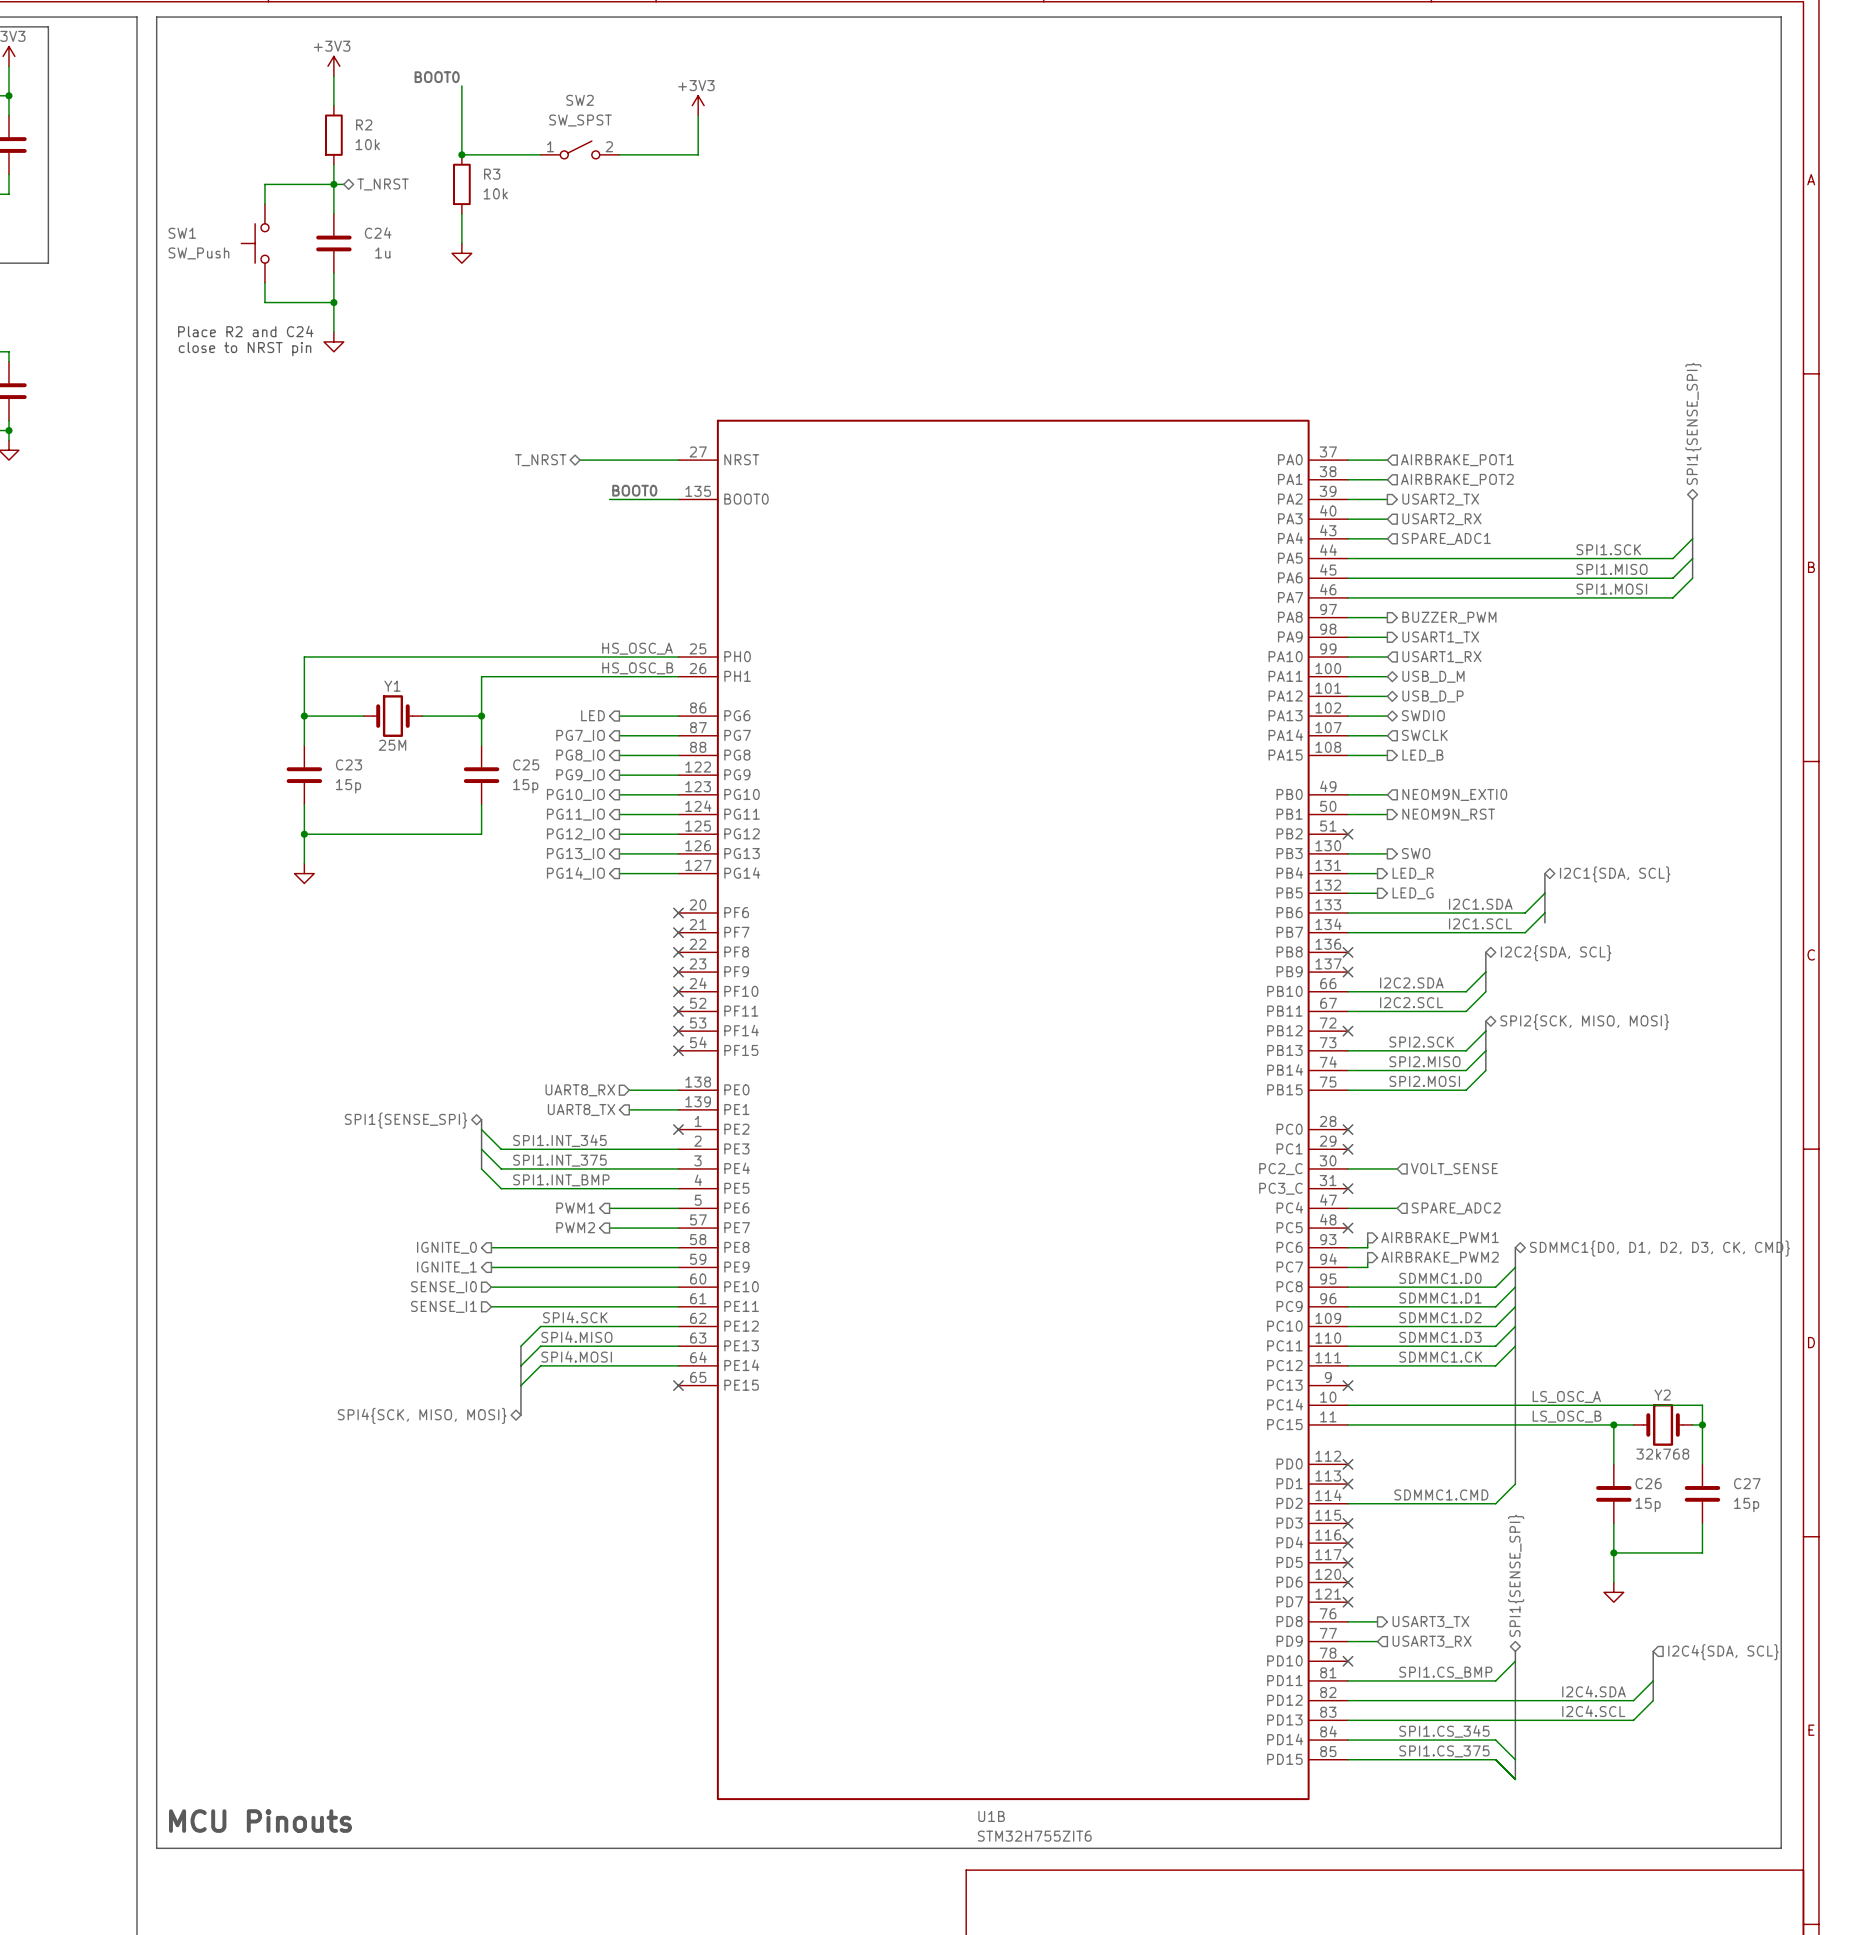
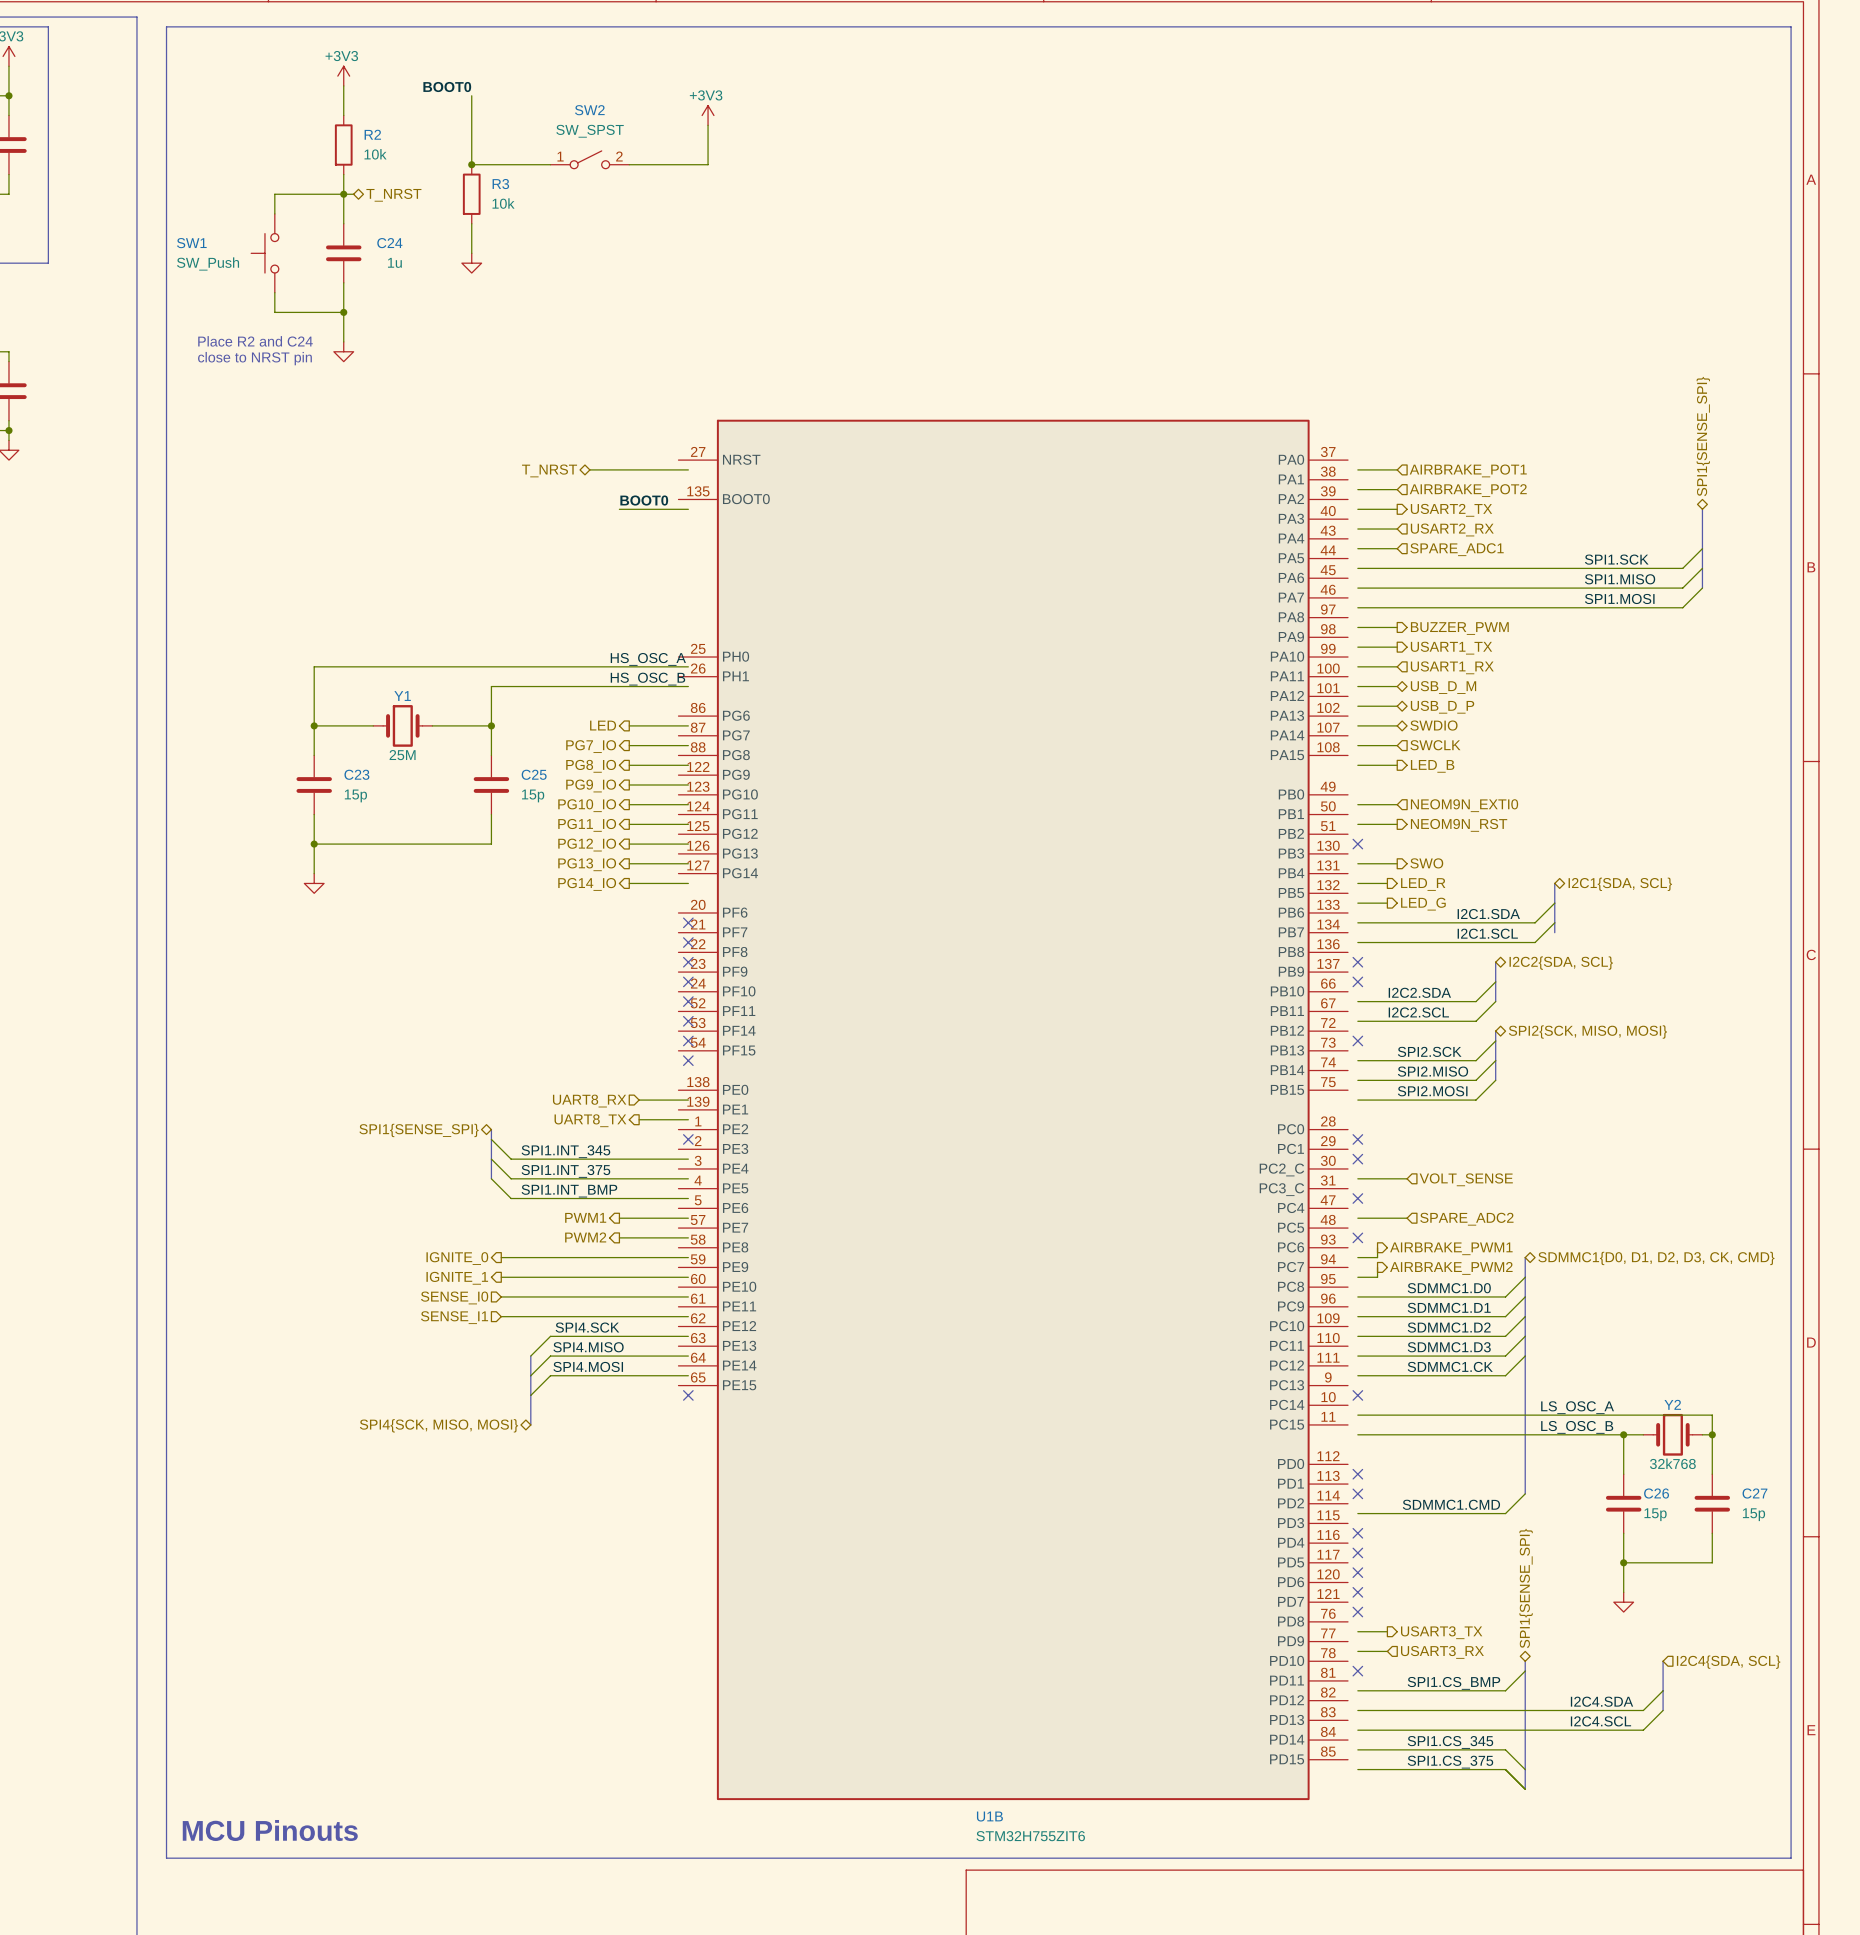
line: (156, 17) (1781, 17) (1781, 1848) (156, 1848) (156, 17) -> (166, 26) (1791, 26) (1791, 1858) (166, 1858) (166, 26)
power symbol position: +3V3 (333, 66) -> +3V3 (343, 76)
wire: (333, 76) (333, 105) -> (343, 85) (343, 115)
label position: BOOT0 (437, 77) -> BOOT0 (447, 87)
wire: (461, 85) (461, 154) (540, 154) -> (471, 95) (471, 164) (550, 164)
power symbol position: +3V3 (698, 105) -> +3V3 (708, 115)
wire: (698, 115) (698, 154) (619, 154) -> (708, 125) (708, 164) (629, 164)
R2 position: (333, 135) -> (343, 145)
SW2 position: (580, 149) -> (589, 159)
junction position: (461, 154) -> (471, 164)
wire: (333, 164) (333, 213) -> (343, 174) (343, 223)
junction position: (333, 184) -> (343, 194)
wire: (343, 184) (264, 184) (264, 204) -> (353, 194) (274, 194) (274, 213)
hierarchical label position: T_NRST (383, 184) -> T_NRST (393, 195)
R3 position: (461, 184) -> (471, 194)
wire: (461, 213) (461, 243) -> (471, 223) (471, 253)
SW1 position: (255, 243) -> (264, 253)
C24 position: (333, 243) -> (343, 253)
power symbol position: (461, 253) -> (471, 263)
wire: (333, 273) (333, 332) -> (343, 282) (343, 341)
wire: (264, 282) (264, 302) (333, 302) -> (274, 292) (274, 312) (343, 312)
junction position: (333, 302) -> (343, 312)
text position: Place R2 and C24 (245, 331) -> Place R2 and C24 (255, 341)
power symbol position: (333, 341) -> (343, 351)
text position: close to NRST pin (245, 349) -> close to NRST pin (254, 358)
hierarchical label position: SPI1{SENSE_SPI} (1693, 423) -> SPI1{SENSE_SPI} (1703, 436)
hierarchical label position: T_NRST (540, 460) -> T_NRST (549, 470)
wire: (580, 460) (678, 460) -> (589, 469) (688, 469)
wire: (1348, 460) (1387, 460) -> (1357, 469) (1397, 469)
hierarchical label position: AIRBRAKE_POT1 (1457, 460) -> AIRBRAKE_POT1 (1468, 470)
wire: (1348, 479) (1387, 479) -> (1357, 489) (1397, 489)
hierarchical label position: AIRBRAKE_POT2 (1457, 479) -> AIRBRAKE_POT2 (1468, 490)
label position: BOOT0 (634, 490) -> BOOT0 (644, 500)
wire: (609, 499) (678, 499) -> (619, 509) (688, 509)
wire: (1348, 499) (1387, 499) -> (1357, 509) (1397, 509)
hierarchical label position: USART2_TX (1440, 499) -> USART2_TX (1451, 510)
bus: (1692, 499) (1692, 578) -> (1702, 509) (1702, 588)
wire: (1348, 519) (1387, 519) -> (1357, 529) (1397, 529)
hierarchical label position: USART2_RX (1441, 519) -> USART2_RX (1452, 529)
wire: (1348, 538) (1387, 538) -> (1357, 548) (1397, 548)
hierarchical label position: SPARE_ADC1 (1446, 538) -> SPARE_ADC1 (1457, 549)
wire: (1692, 538) (1672, 558) (1348, 558) -> (1702, 588) (1682, 607) (1357, 607)
wire: none -> (1702, 548) (1692, 558)
label position: SPI1.SCK (1608, 549) -> SPI1.SCK (1616, 559)
wire: (1682, 568) (1672, 578) (1348, 578) -> (1682, 568) (1357, 568)
wire: none -> (1702, 568) (1692, 578)
label position: SPI1.MISO (1612, 569) -> SPI1.MISO (1620, 579)
wire: (1682, 588) (1672, 597) (1348, 597) -> (1682, 588) (1357, 588)
label position: SPI1.MOSI (1611, 589) -> SPI1.MOSI (1619, 598)
wire: (1348, 617) (1387, 617) -> (1357, 627) (1397, 627)
hierarchical label position: BUZZER_PWM (1449, 617) -> BUZZER_PWM (1459, 628)
wire: (1348, 637) (1387, 637) -> (1357, 647) (1397, 647)
hierarchical label position: USART1_TX (1440, 637) -> USART1_TX (1451, 648)
label position: HS_OSC_A (637, 648) -> HS_OSC_A (648, 659)
wire: (678, 657) (304, 657) (304, 745) -> (688, 666) (314, 666) (314, 755)
wire: (1348, 657) (1387, 657) -> (1357, 666) (1397, 666)
hierarchical label position: USART1_RX (1441, 657) -> USART1_RX (1452, 667)
label position: HS_OSC_B (637, 668) -> HS_OSC_B (647, 679)
wire: (678, 676) (481, 676) (481, 745) -> (688, 686) (491, 686) (491, 755)
wire: (1348, 676) (1387, 676) -> (1357, 686) (1397, 686)
hierarchical label position: USB_D_M (1433, 676) -> USB_D_M (1443, 687)
wire: (1348, 696) (1387, 696) -> (1357, 706) (1397, 706)
hierarchical label position: USB_D_P (1433, 696) -> USB_D_P (1442, 707)
hierarchical label position: LED (593, 715) -> LED (603, 725)
hierarchical label position: SWDIO (1423, 715) -> SWDIO (1433, 725)
wire: (304, 716) (363, 716) -> (314, 725) (373, 725)
junction position: (304, 716) -> (314, 725)
Y1 position: (392, 716) -> (402, 725)
wire: (422, 716) (481, 716) -> (432, 725) (491, 725)
junction position: (481, 716) -> (491, 725)
wire: (619, 716) (678, 716) -> (629, 725) (688, 725)
wire: (1348, 716) (1387, 716) -> (1357, 725) (1397, 725)
hierarchical label position: PG7_IO (580, 735) -> PG7_IO (591, 746)
wire: (619, 735) (678, 735) -> (629, 745) (688, 745)
wire: (1348, 735) (1387, 735) -> (1357, 745) (1397, 745)
hierarchical label position: SWCLK (1424, 735) -> SWCLK (1435, 745)
hierarchical label position: PG8_IO (580, 755) -> PG8_IO (591, 766)
wire: (619, 755) (678, 755) -> (629, 765) (688, 765)
wire: (1348, 755) (1387, 755) -> (1357, 765) (1397, 765)
hierarchical label position: LED_B (1422, 755) -> LED_B (1432, 766)
C23 position: (304, 775) -> (314, 784)
C25 position: (481, 775) -> (491, 784)
hierarchical label position: PG9_IO (580, 775) -> PG9_IO (591, 785)
wire: (619, 775) (678, 775) -> (629, 784) (688, 784)
hierarchical label position: PG10_IO (575, 794) -> PG10_IO (587, 805)
wire: (619, 794) (678, 794) -> (629, 804) (688, 804)
wire: (1348, 794) (1387, 794) -> (1357, 804) (1397, 804)
hierarchical label position: NEOM9N_EXTI0 (1454, 794) -> NEOM9N_EXTI0 (1464, 805)
wire: (304, 804) (304, 863) -> (314, 814) (314, 873)
wire: (481, 804) (481, 834) (304, 834) -> (491, 814) (491, 844) (314, 844)
hierarchical label position: PG11_IO (575, 814) -> PG11_IO (587, 825)
wire: (619, 814) (678, 814) -> (629, 824) (688, 824)
wire: (1348, 814) (1387, 814) -> (1357, 824) (1397, 824)
hierarchical label position: NEOM9N_RST (1448, 814) -> NEOM9N_RST (1459, 825)
junction position: (304, 834) -> (314, 844)
hierarchical label position: PG12_IO (575, 834) -> PG12_IO (587, 845)
wire: (619, 834) (678, 834) -> (629, 844) (688, 844)
no-connect mark position: (1348, 834) -> (1357, 844)
wire: (619, 853) (678, 853) -> (629, 863) (688, 863)
wire: (1348, 853) (1387, 853) -> (1357, 863) (1397, 863)
hierarchical label position: SWO (1416, 853) -> SWO (1426, 863)
hierarchical label position: PG13_IO (575, 854) -> PG13_IO (587, 864)
power symbol position: (304, 873) -> (314, 883)
hierarchical label position: PG14_IO (575, 873) -> PG14_IO (587, 884)
wire: (619, 873) (678, 873) -> (629, 883) (688, 883)
wire: (1348, 873) (1377, 873) -> (1357, 883) (1387, 883)
hierarchical label position: LED_R (1413, 873) -> LED_R (1423, 884)
bus: (1544, 873) (1544, 922) -> (1554, 883) (1554, 932)
hierarchical label position: I2C1{SDA, SCL} (1615, 874) -> I2C1{SDA, SCL} (1620, 884)
wire: (1348, 893) (1377, 893) -> (1357, 903) (1387, 903)
hierarchical label position: LED_G (1413, 893) -> LED_G (1423, 904)
wire: (1544, 893) (1525, 912) (1348, 912) -> (1554, 922) (1535, 942) (1357, 942)
wire: none -> (1554, 903) (1544, 912)
label position: I2C1.SDA (1480, 904) -> I2C1.SDA (1488, 914)
no-connect mark: (678, 912) -> none
no-connect mark: none -> (688, 922)
wire: (1535, 922) (1525, 932) (1348, 932) -> (1535, 922) (1357, 922)
label position: I2C1.SCL (1480, 923) -> I2C1.SCL (1487, 933)
no-connect mark: (678, 932) -> none
no-connect mark: none -> (688, 942)
no-connect mark: (678, 952) -> none
no-connect mark: (1348, 952) -> none
bus: (1485, 952) (1485, 991) -> (1495, 962) (1495, 1001)
hierarchical label position: I2C2{SDA, SCL} (1556, 953) -> I2C2{SDA, SCL} (1561, 963)
no-connect mark: none -> (688, 962)
no-connect mark: none -> (1357, 962)
no-connect mark: (678, 972) -> none
no-connect mark: (1348, 972) -> none
wire: (1485, 972) (1466, 991) (1348, 991) -> (1495, 1001) (1476, 1021) (1357, 1021)
no-connect mark: none -> (688, 981)
no-connect mark: none -> (1357, 981)
wire: none -> (1495, 981) (1485, 991)
label position: I2C2.SDA (1411, 982) -> I2C2.SDA (1419, 992)
no-connect mark: (678, 991) -> none
no-connect mark: none -> (688, 1001)
wire: (1476, 1001) (1466, 1011) (1348, 1011) -> (1476, 1001) (1357, 1001)
label position: I2C2.SCL (1411, 1002) -> I2C2.SCL (1418, 1012)
no-connect mark: (678, 1011) -> none
no-connect mark: none -> (688, 1021)
bus: (1485, 1021) (1485, 1070) -> (1495, 1031) (1495, 1080)
hierarchical label position: SPI2{SCK, MISO, MOSI} (1584, 1022) -> SPI2{SCK, MISO, MOSI} (1587, 1031)
no-connect mark: (678, 1031) -> none
no-connect mark position: (1348, 1031) -> (1357, 1040)
wire: (1485, 1031) (1466, 1050) (1348, 1050) -> (1495, 1080) (1476, 1100) (1357, 1100)
no-connect mark: none -> (688, 1040)
wire: none -> (1495, 1040) (1485, 1050)
label position: SPI2.SCK (1421, 1042) -> SPI2.SCK (1429, 1051)
no-connect mark: (678, 1050) -> none
no-connect mark: none -> (688, 1060)
wire: (1476, 1060) (1466, 1070) (1348, 1070) -> (1476, 1060) (1357, 1060)
wire: none -> (1495, 1060) (1485, 1070)
label position: SPI2.MISO (1424, 1061) -> SPI2.MISO (1433, 1071)
wire: (1476, 1080) (1466, 1090) (1348, 1090) -> (1476, 1080) (1357, 1080)
label position: SPI2.MOSI (1424, 1081) -> SPI2.MOSI (1432, 1091)
hierarchical label position: UART8_RX (580, 1090) -> UART8_RX (589, 1101)
wire: (629, 1090) (678, 1090) -> (639, 1100) (688, 1100)
wire: (629, 1109) (678, 1109) -> (639, 1119) (688, 1119)
hierarchical label position: UART8_TX (581, 1110) -> UART8_TX (590, 1120)
bus: (481, 1119) (481, 1168) -> (491, 1129) (491, 1178)
hierarchical label position: SPI1{SENSE_SPI} (405, 1120) -> SPI1{SENSE_SPI} (419, 1130)
no-connect mark position: (678, 1129) -> (688, 1139)
no-connect mark: (1348, 1129) -> none
no-connect mark: none -> (1357, 1139)
label position: SPI1.INT_345 (559, 1140) -> SPI1.INT_345 (565, 1151)
wire: (481, 1149) (491, 1159) -> none
wire: (501, 1149) (678, 1149) -> (501, 1149) (511, 1159) (688, 1159)
no-connect mark: (1348, 1149) -> none
no-connect mark: none -> (1357, 1159)
label position: SPI1.INT_375 (559, 1160) -> SPI1.INT_375 (565, 1171)
wire: (481, 1168) (491, 1178) -> none
wire: (501, 1168) (678, 1168) -> (501, 1168) (511, 1178) (688, 1178)
wire: (1348, 1168) (1397, 1168) -> (1357, 1178) (1407, 1178)
hierarchical label position: VOLT_SENSE (1454, 1169) -> VOLT_SENSE (1466, 1179)
label position: SPI1.INT_BMP (561, 1180) -> SPI1.INT_BMP (569, 1191)
wire: (501, 1188) (678, 1188) -> (501, 1188) (511, 1198) (688, 1198)
no-connect mark position: (1348, 1188) -> (1357, 1198)
hierarchical label position: PWM1 (575, 1207) -> PWM1 (585, 1217)
wire: (609, 1208) (678, 1208) -> (619, 1218) (688, 1218)
wire: (1348, 1208) (1397, 1208) -> (1357, 1218) (1407, 1218)
hierarchical label position: SPARE_ADC2 (1456, 1208) -> SPARE_ADC2 (1466, 1219)
hierarchical label position: PWM2 (575, 1227) -> PWM2 (585, 1237)
wire: (609, 1228) (678, 1228) -> (619, 1237) (688, 1237)
no-connect mark position: (1348, 1228) -> (1357, 1237)
wire: (1367, 1237) (1367, 1247) (1348, 1247) -> (1377, 1247) (1377, 1257) (1357, 1257)
hierarchical label position: AIRBRAKE_PWM1 (1440, 1238) -> AIRBRAKE_PWM1 (1451, 1248)
hierarchical label position: IGNITE_0 (446, 1247) -> IGNITE_0 (457, 1258)
wire: (491, 1247) (678, 1247) -> (501, 1257) (688, 1257)
bus: (1515, 1247) (1515, 1484) -> (1525, 1257) (1525, 1493)
hierarchical label position: SDMMC1{D0, D1, D2, D3, CK, CMD} (1659, 1248) -> SDMMC1{D0, D1, D2, D3, CK, CMD} (1656, 1258)
wire: (1367, 1257) (1367, 1267) (1348, 1267) -> (1377, 1267) (1377, 1277) (1357, 1277)
hierarchical label position: AIRBRAKE_PWM2 (1440, 1257) -> AIRBRAKE_PWM2 (1451, 1268)
hierarchical label position: IGNITE_1 (446, 1267) -> IGNITE_1 (457, 1278)
wire: (491, 1267) (678, 1267) -> (501, 1277) (688, 1277)
wire: (1515, 1267) (1495, 1287) (1348, 1287) -> (1525, 1356) (1505, 1375) (1357, 1375)
wire: none -> (1525, 1277) (1515, 1287)
label position: SDMMC1.D0 (1440, 1278) -> SDMMC1.D0 (1449, 1288)
hierarchical label position: SENSE_I0 (443, 1287) -> SENSE_I0 (454, 1297)
wire: (491, 1287) (678, 1287) -> (501, 1296) (688, 1296)
wire: (1505, 1296) (1495, 1306) (1348, 1306) -> (1505, 1296) (1357, 1296)
wire: none -> (1525, 1296) (1515, 1306)
label position: SDMMC1.D1 (1440, 1298) -> SDMMC1.D1 (1449, 1307)
hierarchical label position: SENSE_I1 (443, 1306) -> SENSE_I1 (454, 1317)
wire: (491, 1306) (678, 1306) -> (501, 1316) (688, 1316)
wire: (1505, 1316) (1495, 1326) (1348, 1326) -> (1505, 1316) (1357, 1316)
wire: none -> (1525, 1316) (1515, 1326)
label position: SPI4.SCK (575, 1317) -> SPI4.SCK (587, 1327)
label position: SDMMC1.D2 (1440, 1317) -> SDMMC1.D2 (1449, 1327)
wire: (678, 1326) (540, 1326) (520, 1346) -> (688, 1375) (550, 1375) (530, 1395)
wire: (1505, 1336) (1495, 1346) (1348, 1346) -> (1505, 1336) (1357, 1336)
wire: none -> (1525, 1336) (1515, 1346)
label position: SPI4.MISO (576, 1337) -> SPI4.MISO (588, 1347)
label position: SDMMC1.D3 (1440, 1337) -> SDMMC1.D3 (1449, 1347)
bus: (520, 1346) (520, 1415) -> (530, 1356) (530, 1424)
wire: (540, 1346) (678, 1346) -> (540, 1346) (550, 1336) (688, 1336)
wire: (530, 1356) (520, 1365) -> none
label position: SPI4.MOSI (576, 1356) -> SPI4.MOSI (588, 1366)
wire: (1505, 1356) (1495, 1365) (1348, 1365) -> (1505, 1356) (1357, 1356)
label position: SDMMC1.CK (1440, 1357) -> SDMMC1.CK (1450, 1366)
wire: (540, 1365) (678, 1365) -> (540, 1365) (550, 1356) (688, 1356)
wire: (530, 1375) (520, 1385) -> none
no-connect mark position: (678, 1385) -> (688, 1395)
no-connect mark position: (1348, 1385) -> (1357, 1395)
label position: LS_OSC_A (1566, 1396) -> LS_OSC_A (1577, 1407)
wire: (1348, 1405) (1702, 1405) (1702, 1464) -> (1357, 1415) (1712, 1415) (1712, 1474)
hierarchical label position: SPI4{SCK, MISO, MOSI} (422, 1415) -> SPI4{SCK, MISO, MOSI} (438, 1425)
label position: LS_OSC_B (1567, 1416) -> LS_OSC_B (1577, 1427)
wire: (1348, 1424) (1633, 1424) -> (1357, 1434) (1643, 1434)
wire: (1613, 1424) (1613, 1464) -> (1623, 1434) (1623, 1474)
junction position: (1613, 1424) -> (1623, 1434)
Y2 position: (1663, 1424) -> (1672, 1434)
wire: (1692, 1424) (1702, 1424) -> (1702, 1434) (1712, 1434)
junction position: (1702, 1424) -> (1712, 1434)
no-connect mark: (1348, 1464) -> none
no-connect mark: none -> (1357, 1474)
no-connect mark: (1348, 1484) -> none
wire: (1515, 1484) (1495, 1503) (1348, 1503) -> (1525, 1493) (1505, 1513) (1357, 1513)
no-connect mark: none -> (1357, 1493)
C26 position: (1613, 1493) -> (1623, 1503)
C27 position: (1702, 1493) -> (1712, 1503)
label position: SDMMC1.CMD (1441, 1494) -> SDMMC1.CMD (1451, 1504)
no-connect mark: (1348, 1523) -> none
wire: (1613, 1523) (1613, 1582) -> (1623, 1533) (1623, 1592)
wire: (1702, 1523) (1702, 1552) (1613, 1552) -> (1712, 1533) (1712, 1562) (1623, 1562)
no-connect mark: none -> (1357, 1533)
no-connect mark: (1348, 1543) -> none
no-connect mark: none -> (1357, 1552)
junction position: (1613, 1552) -> (1623, 1562)
no-connect mark: (1348, 1562) -> none
no-connect mark: none -> (1357, 1572)
hierarchical label position: SPI1{SENSE_SPI} (1516, 1575) -> SPI1{SENSE_SPI} (1526, 1588)
no-connect mark: (1348, 1582) -> none
no-connect mark: none -> (1357, 1592)
power symbol position: (1613, 1592) -> (1623, 1602)
no-connect mark: (1348, 1602) -> none
no-connect mark: none -> (1357, 1612)
wire: (1348, 1621) (1377, 1621) -> (1357, 1631) (1387, 1631)
hierarchical label position: USART3_TX (1430, 1621) -> USART3_TX (1441, 1632)
wire: (1348, 1641) (1377, 1641) -> (1357, 1651) (1387, 1651)
hierarchical label position: USART3_RX (1432, 1641) -> USART3_RX (1442, 1652)
bus: (1515, 1651) (1515, 1779) -> (1525, 1661) (1525, 1789)
bus: (1653, 1651) (1653, 1700) -> (1663, 1661) (1663, 1710)
hierarchical label position: I2C4{SDA, SCL} (1723, 1652) -> I2C4{SDA, SCL} (1728, 1662)
no-connect mark position: (1348, 1661) -> (1357, 1671)
wire: (1515, 1661) (1495, 1680) (1348, 1680) -> (1525, 1671) (1505, 1690) (1357, 1690)
label position: SPI1.CS_BMP (1445, 1672) -> SPI1.CS_BMP (1453, 1683)
wire: (1653, 1680) (1633, 1700) (1348, 1700) -> (1663, 1710) (1643, 1730) (1357, 1730)
wire: none -> (1663, 1690) (1653, 1700)
label position: I2C4.SDA (1593, 1691) -> I2C4.SDA (1601, 1701)
wire: (1643, 1710) (1633, 1720) (1348, 1720) -> (1643, 1710) (1357, 1710)
label position: I2C4.SCL (1593, 1711) -> I2C4.SCL (1600, 1721)
label position: SPI1.CS_345 (1444, 1731) -> SPI1.CS_345 (1450, 1742)
wire: (1348, 1740) (1495, 1740) (1505, 1749) -> (1357, 1749) (1505, 1749)
label position: SPI1.CS_375 (1444, 1751) -> SPI1.CS_375 (1450, 1762)
wire: (1348, 1759) (1495, 1759) (1505, 1769) -> (1357, 1769) (1505, 1769)
wire: none -> (1515, 1759) (1525, 1769)
wire: none -> (1515, 1779) (1525, 1789)
text position: MCU Pinouts (260, 1821) -> MCU Pinouts (270, 1830)

